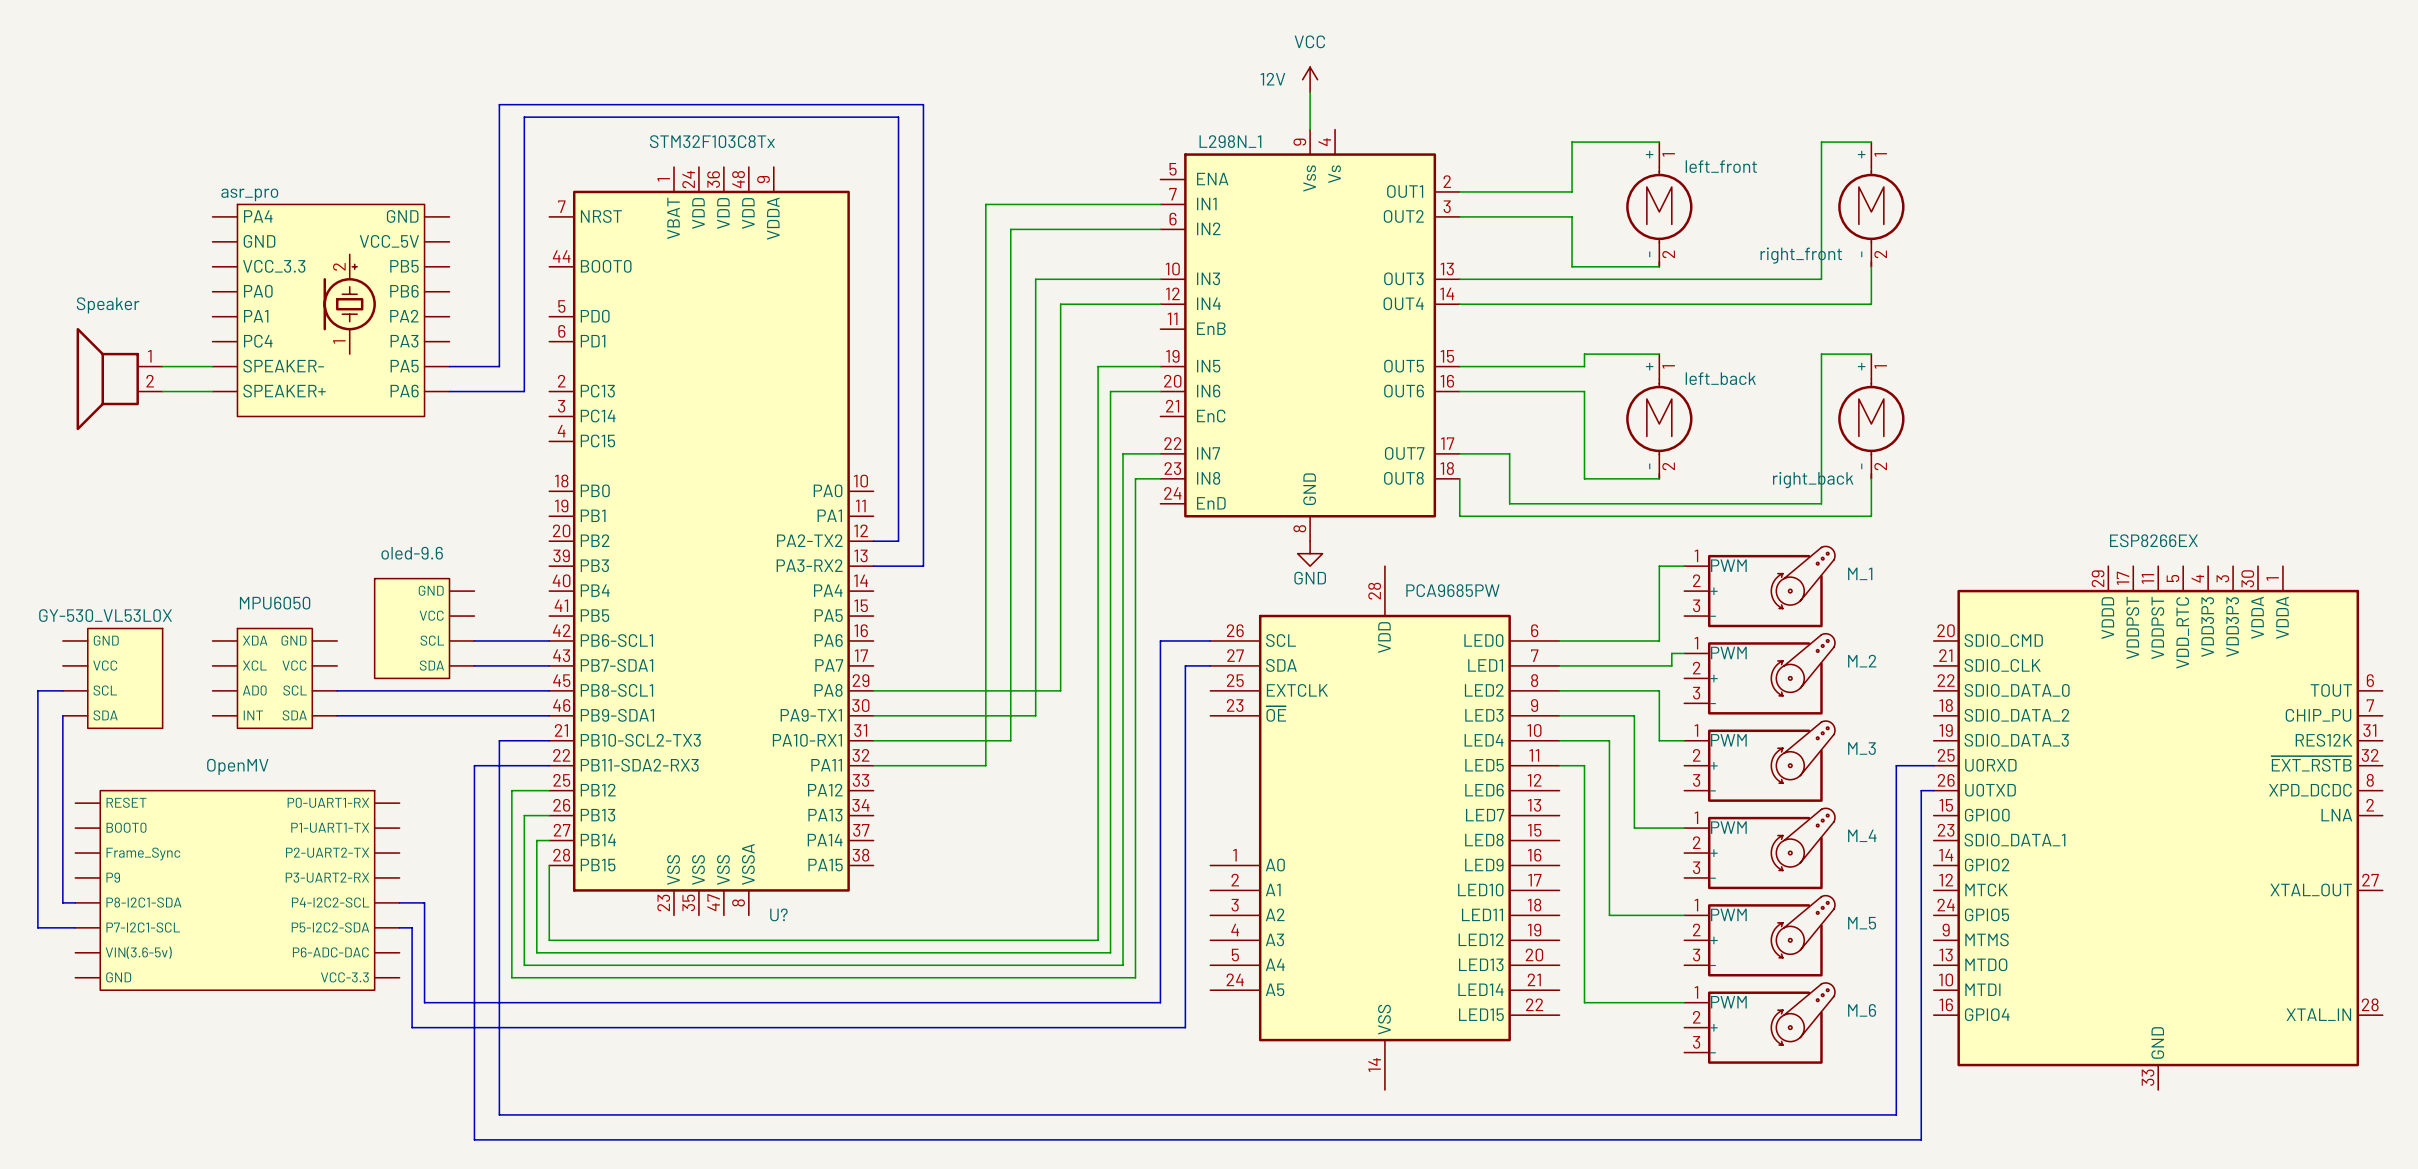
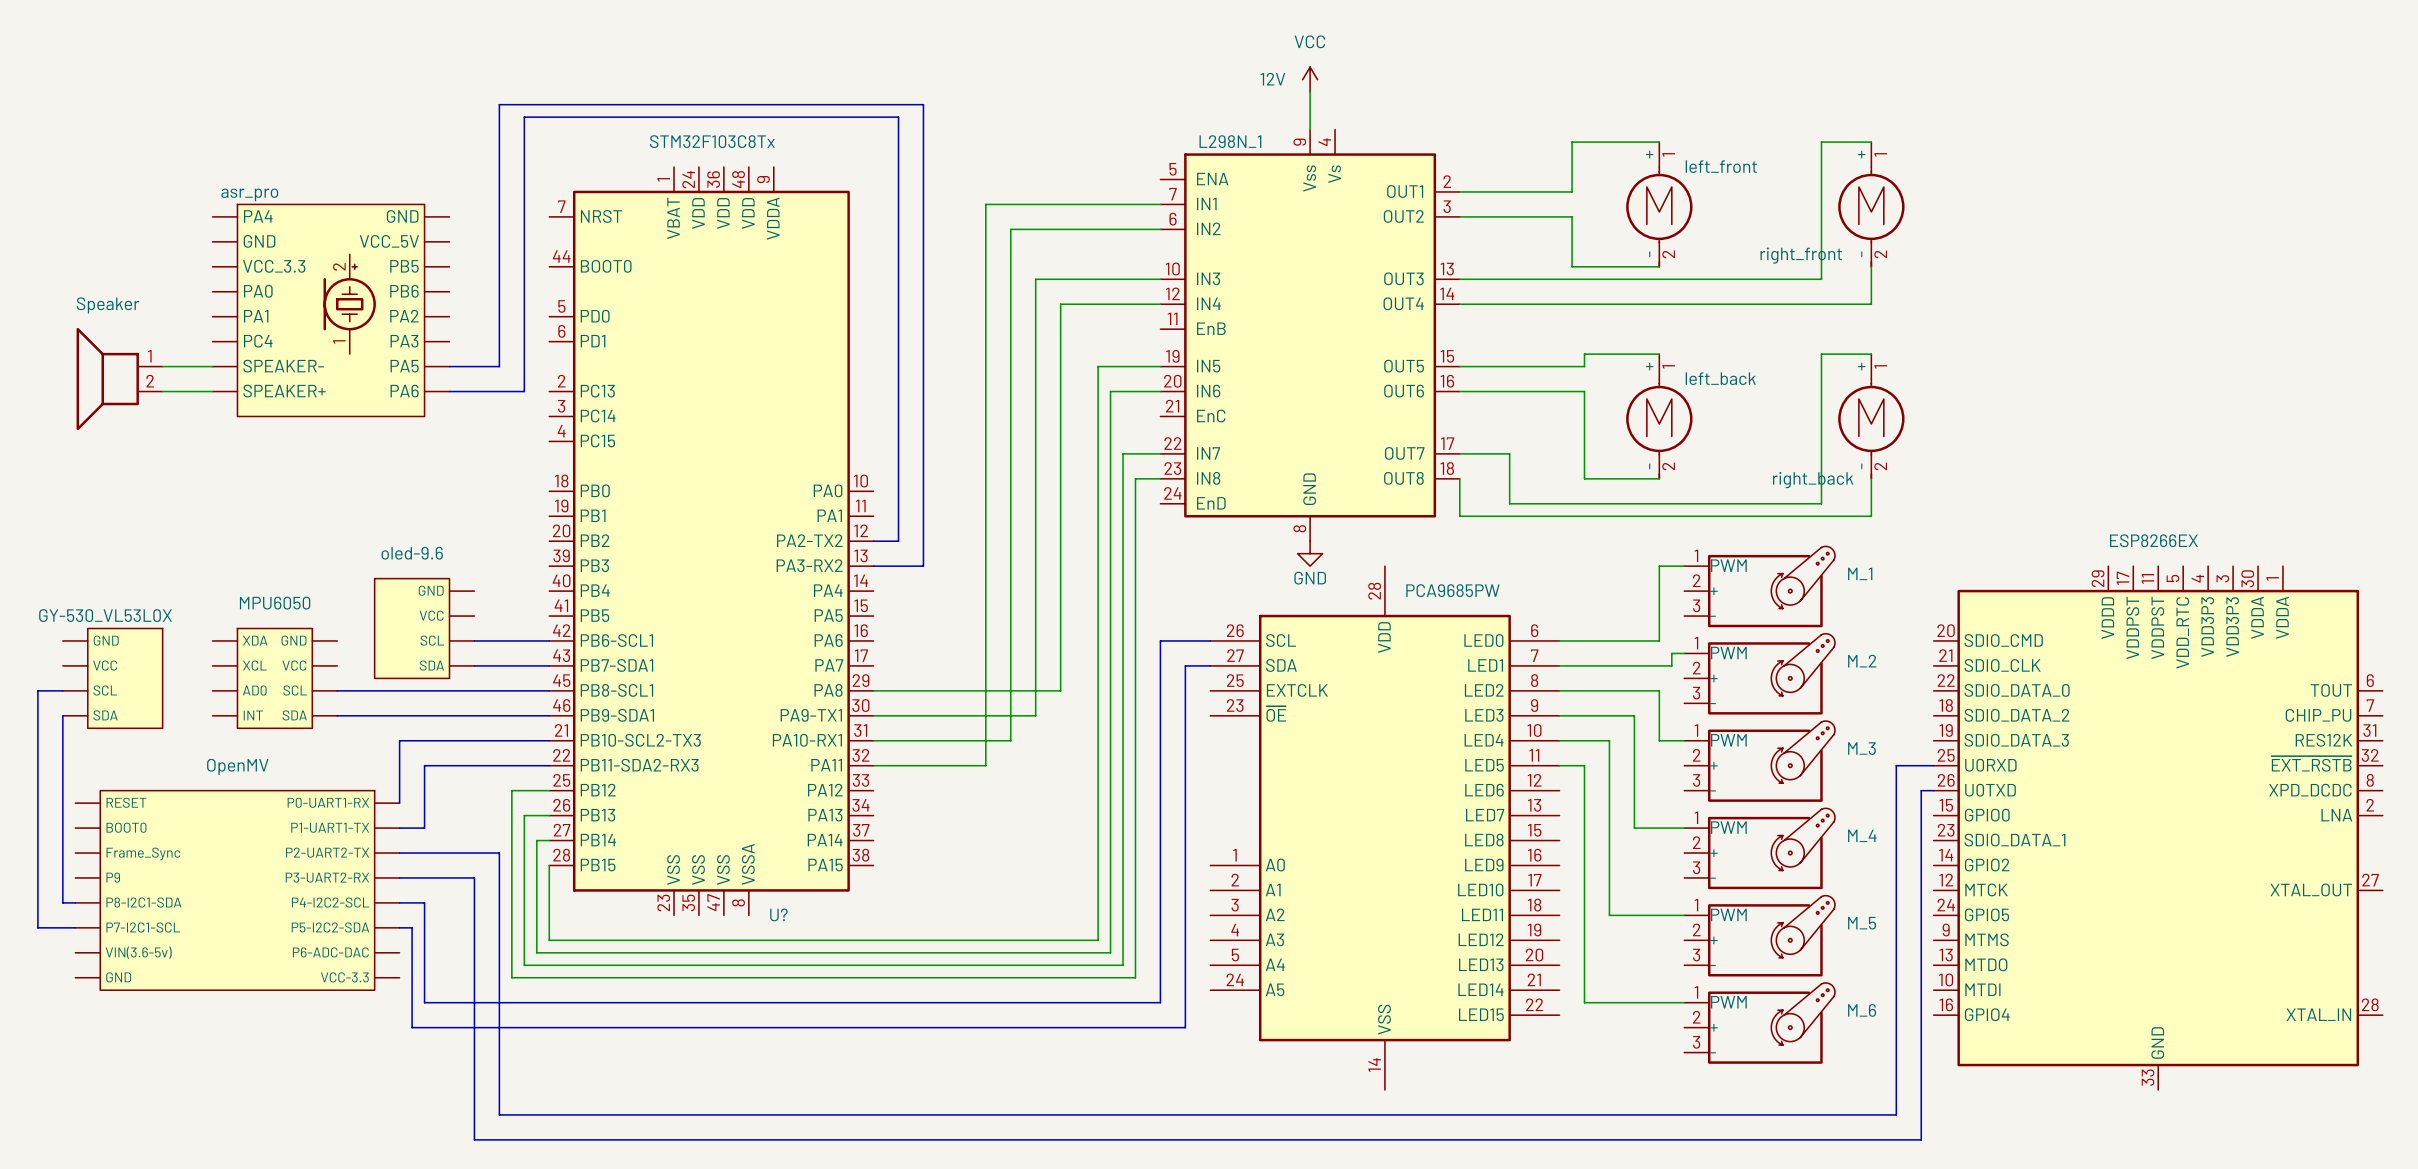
bus: (499, 740) (499, 853) -> (499, 740) (399, 740) (399, 803)
bus: (474, 765) (474, 877) -> (474, 765) (424, 765) (424, 828) (399, 828)
bus: none -> (399, 853) (499, 853)
bus: none -> (399, 877) (474, 877)

